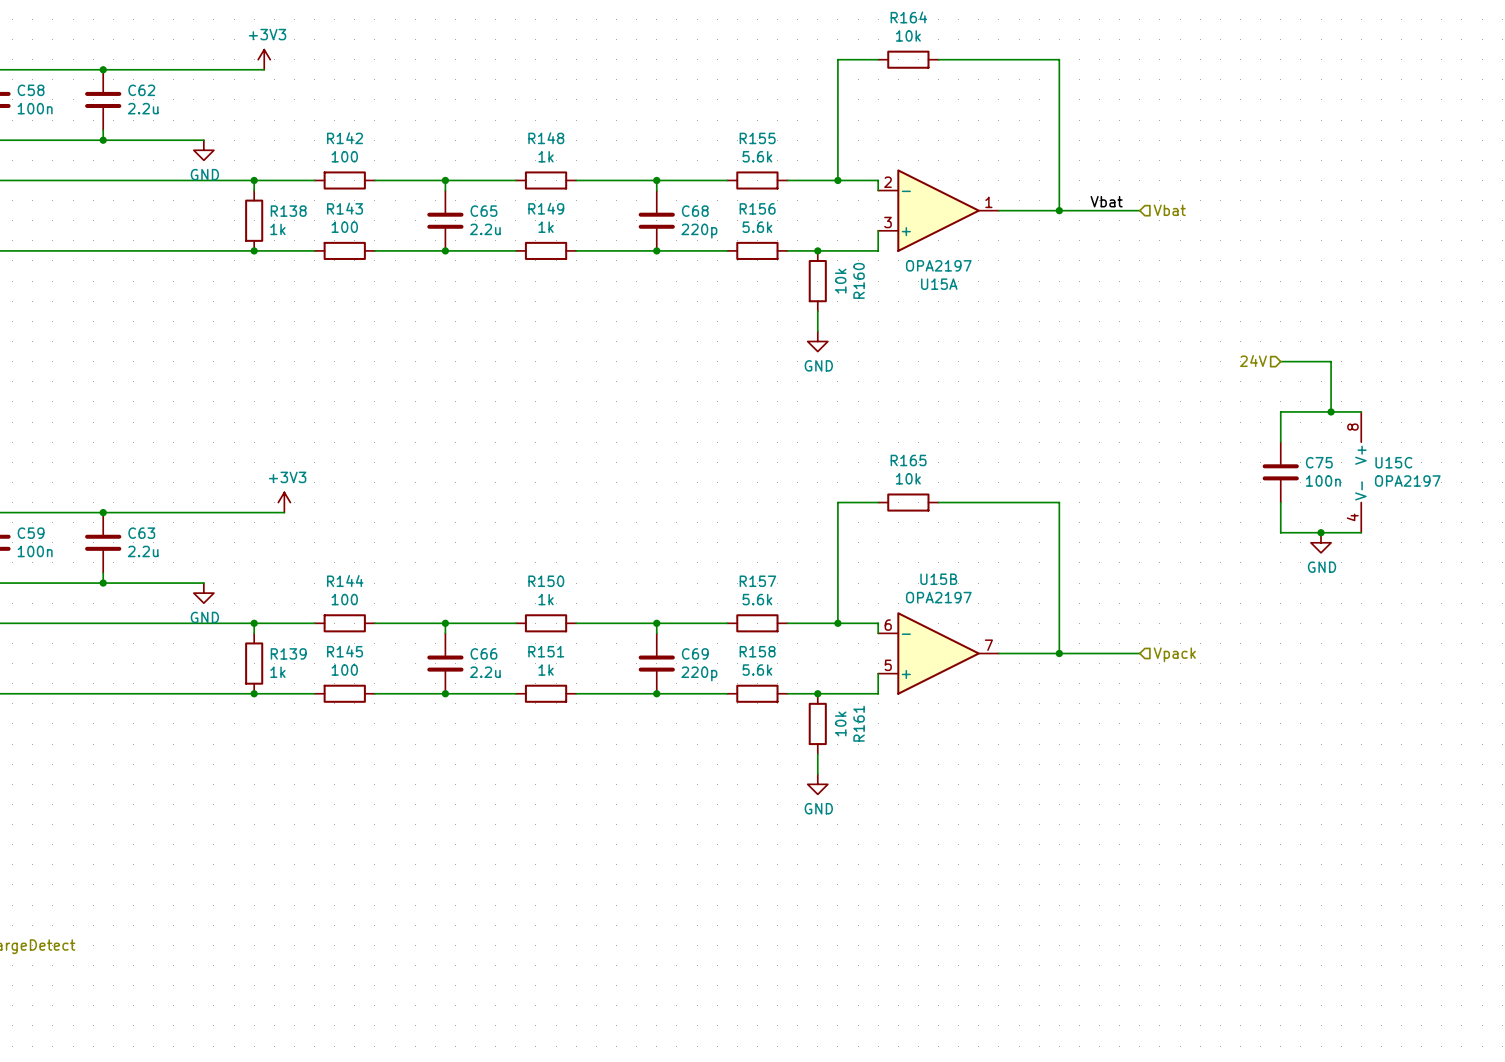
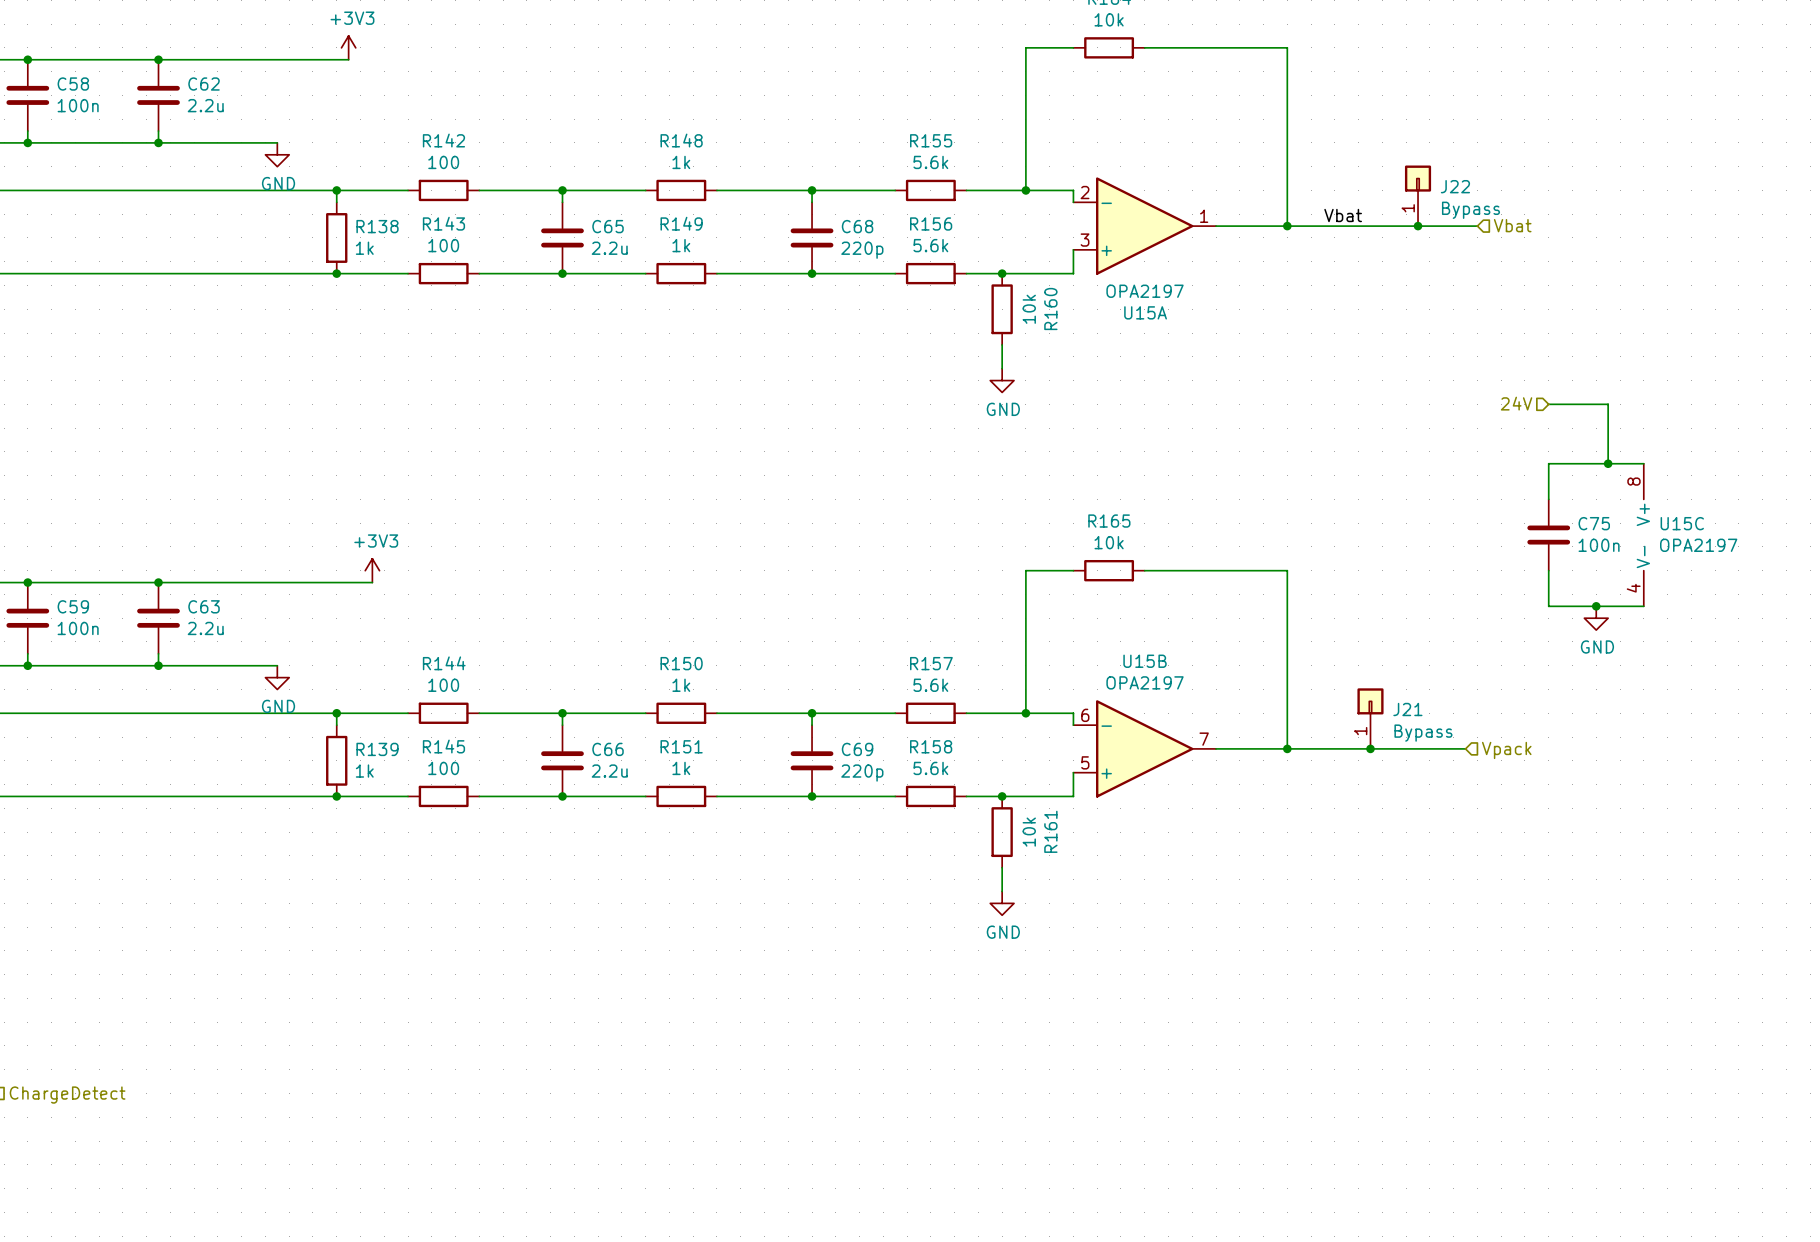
J22: none -> Bypass (1418, 195)
wire: none -> (1382, 226) (1477, 226)
hierarchical label position: Vbat (1169, 210) -> Vbat (1512, 225)
junction: none -> (1418, 226)
J21: none -> Bypass (1370, 718)
junction: none -> (1370, 748)
wire: none -> (1382, 748) (1465, 748)
hierarchical label position: Vpack (1174, 654) -> Vpack (1506, 750)

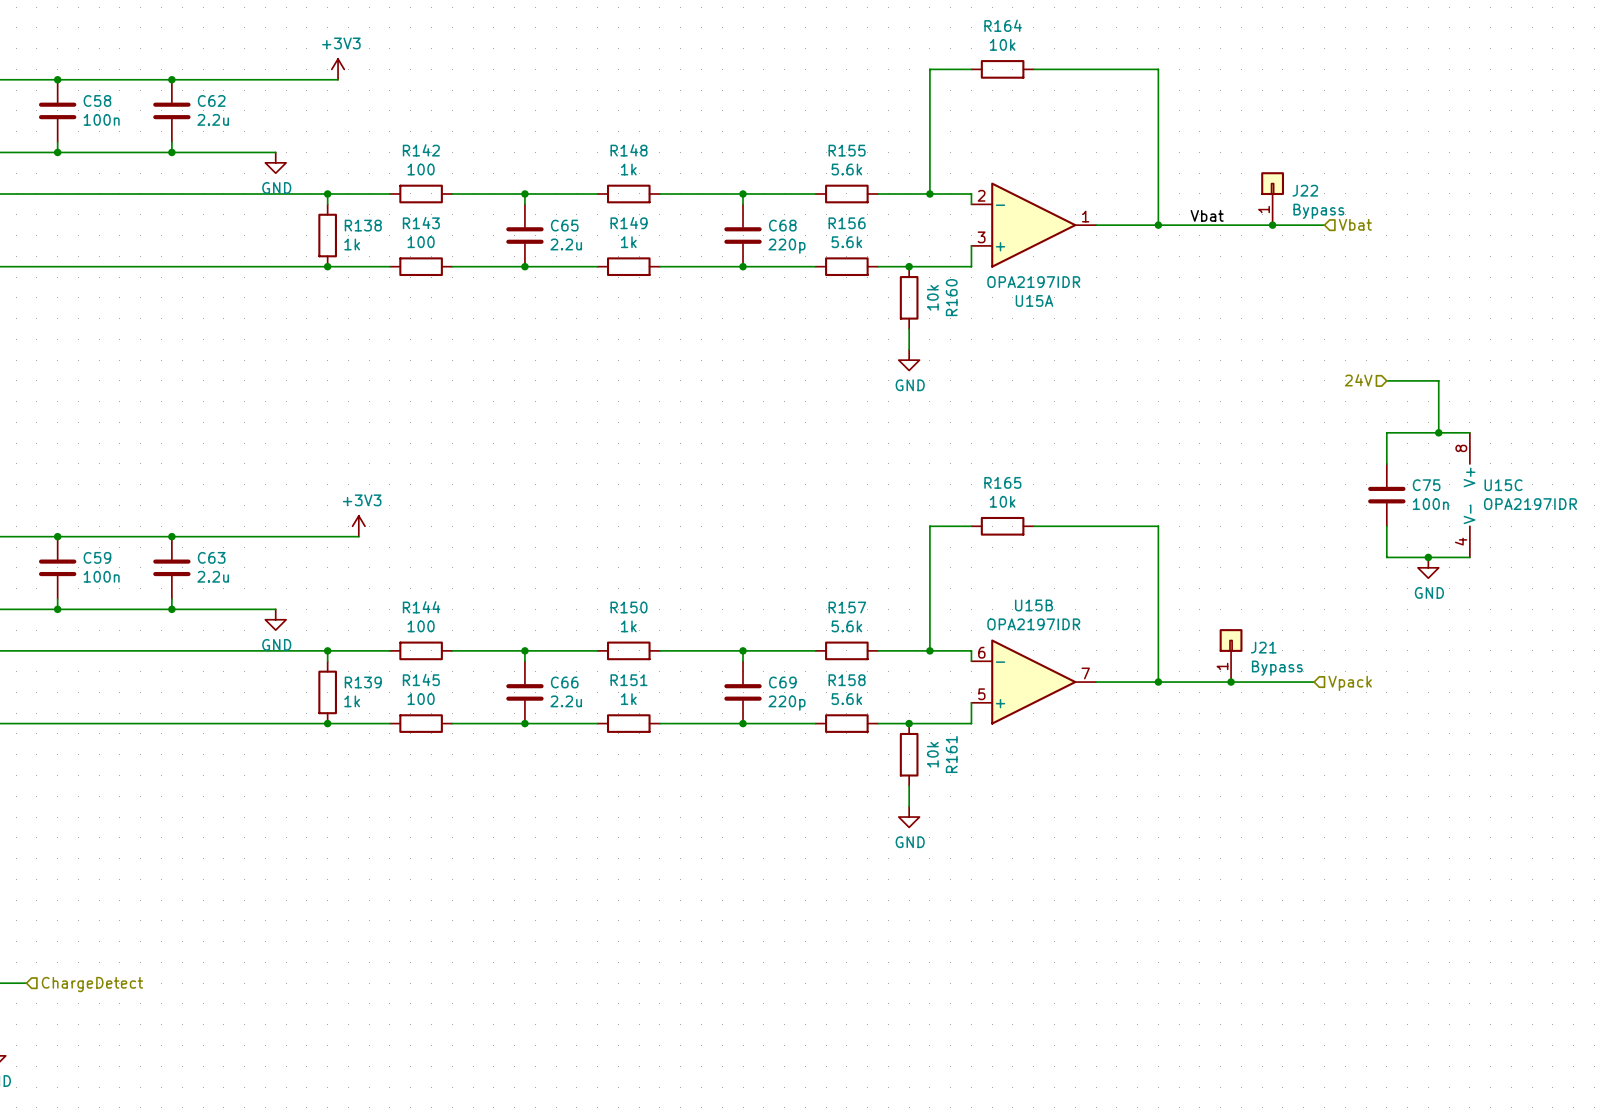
U15A value: OPA2197 (1145, 291) -> OPA2197IDR (1033, 282)
U15C value: OPA2197 (1698, 545) -> OPA2197IDR (1530, 504)
U15B value: OPA2197 (1145, 682) -> OPA2197IDR (1033, 624)

